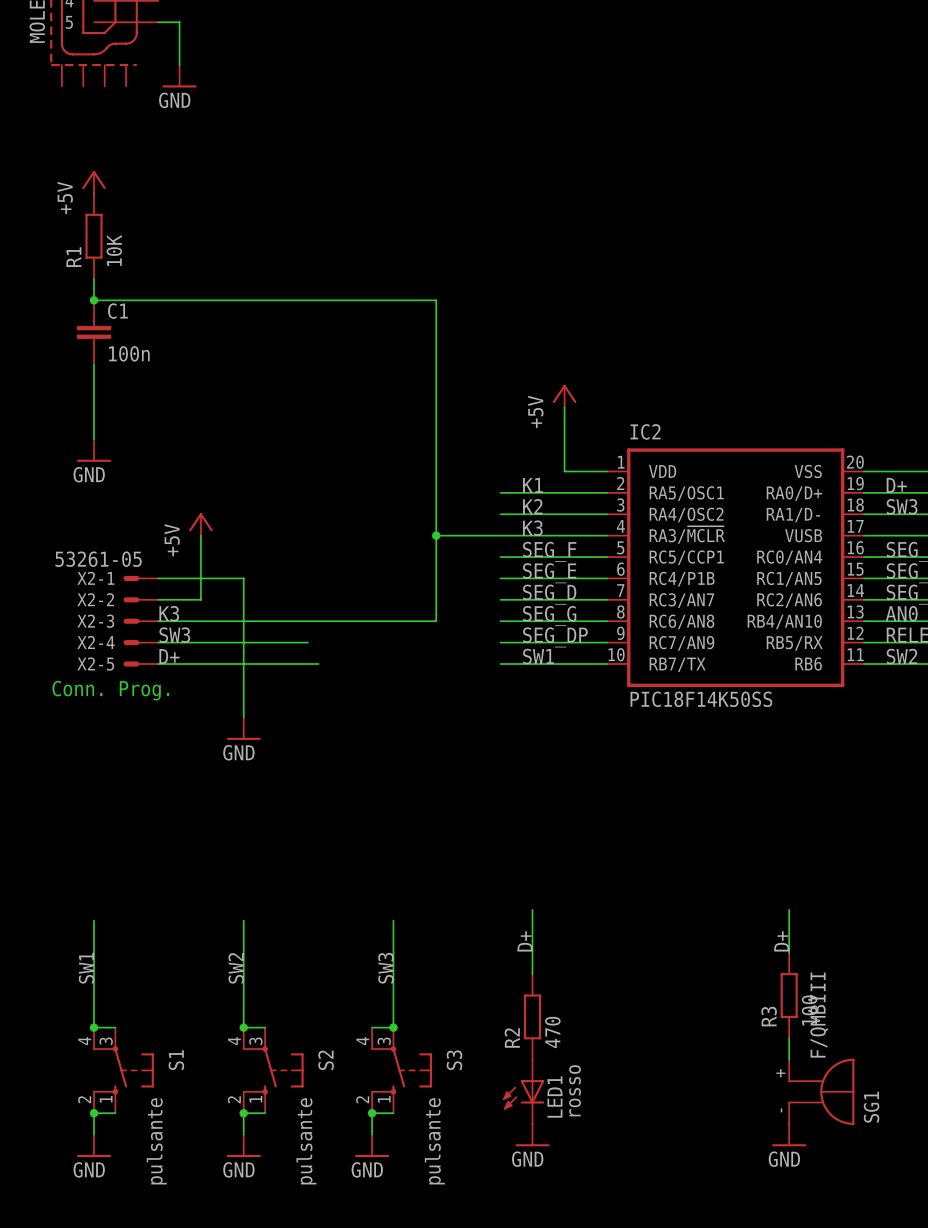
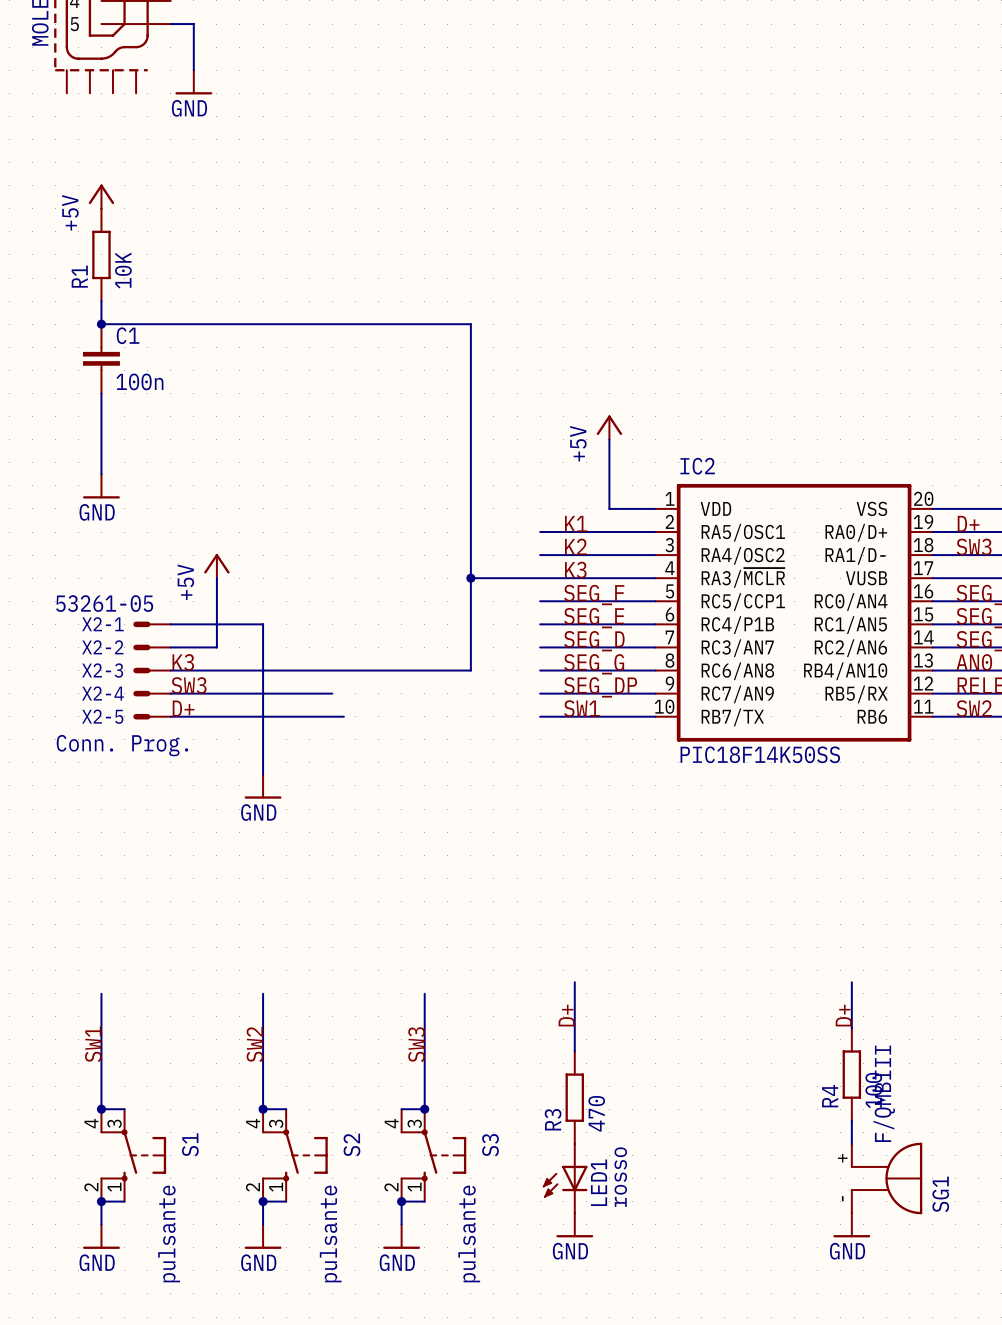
R3 name: R3 (769, 1016) -> R4 (830, 1096)
R2 name: R2 (512, 1038) -> R3 (553, 1119)

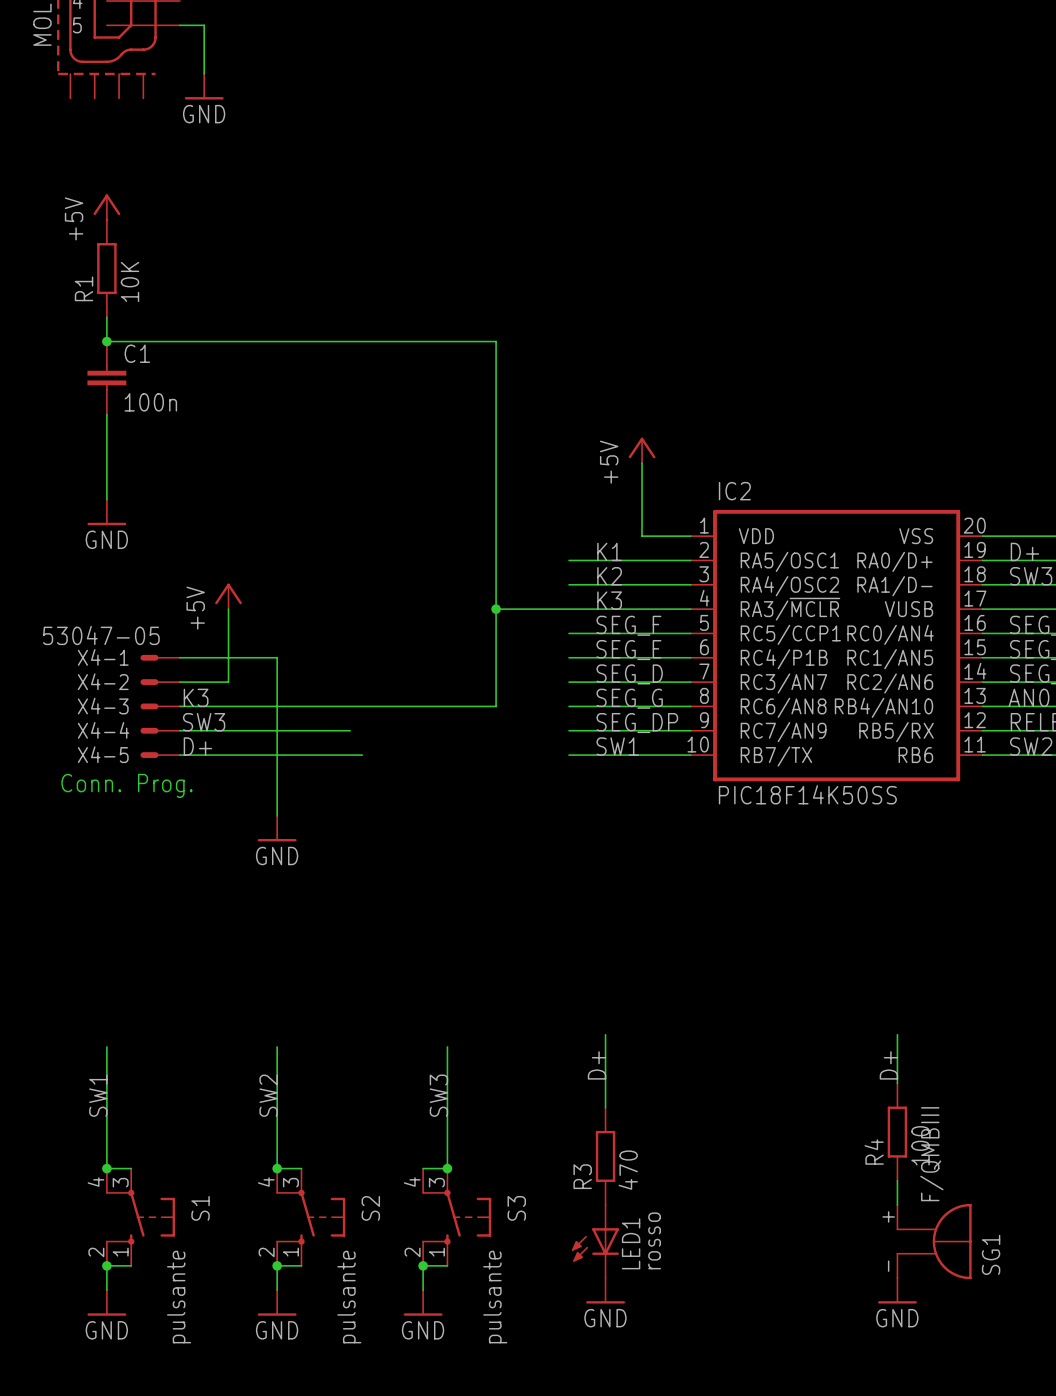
X2-1 value: 53261-05 (104, 603) -> 53047-05 (101, 635)
X2-1 name: X2-1 (102, 624) -> X4-1 (103, 657)
X2-2 name: X2-2 (102, 647) -> X4-2 (103, 681)
X2-3 name: X2-3 (102, 670) -> X4-3 (103, 706)
X2-4 name: X2-4 (103, 693) -> X4-4 (103, 730)
X2-5 name: X2-5 (102, 716) -> X4-5 (103, 754)

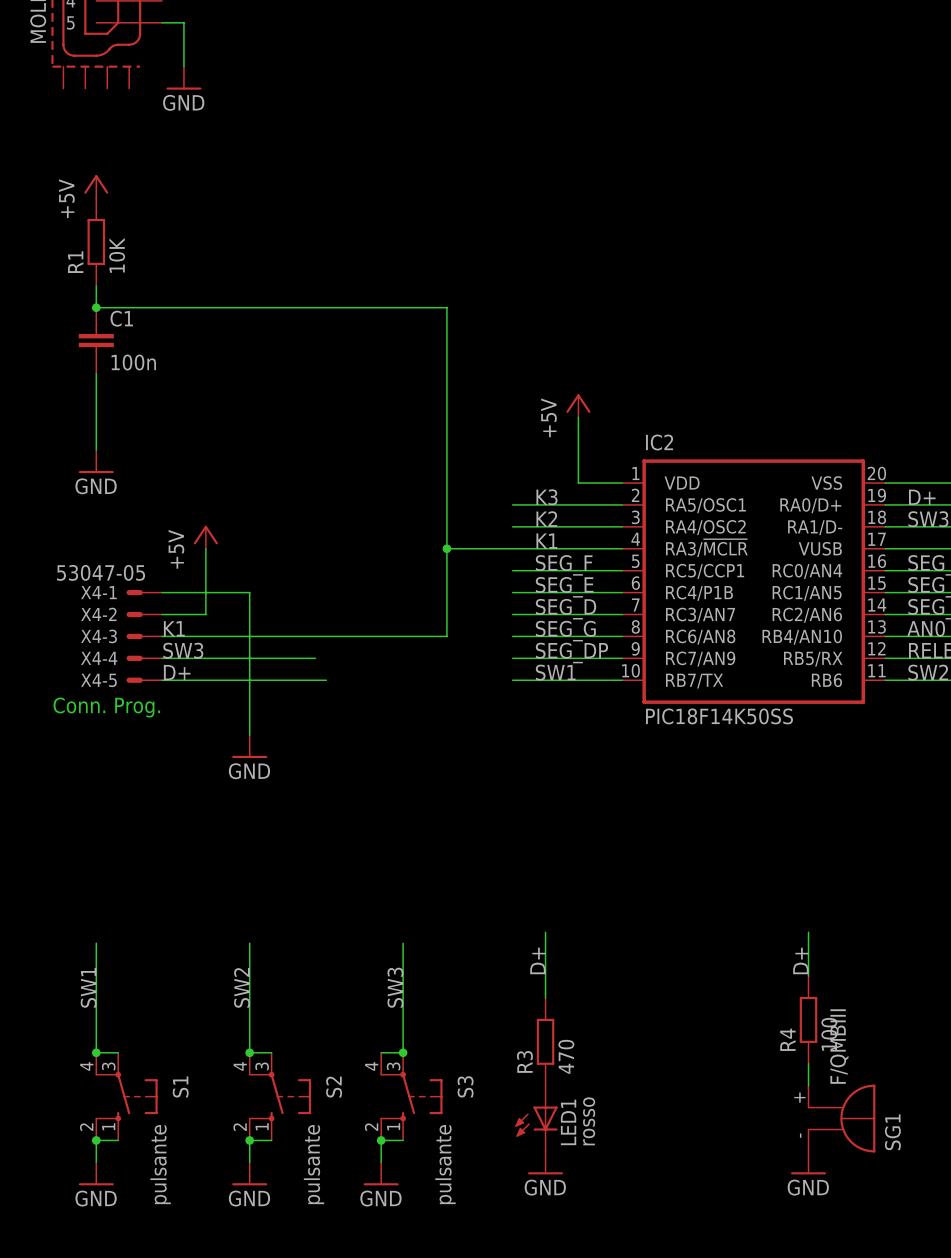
label: K1 (609, 551) -> K3 (546, 497)
label: K3 (609, 600) -> K1 (546, 541)
label: K3 (196, 697) -> K1 (174, 628)

